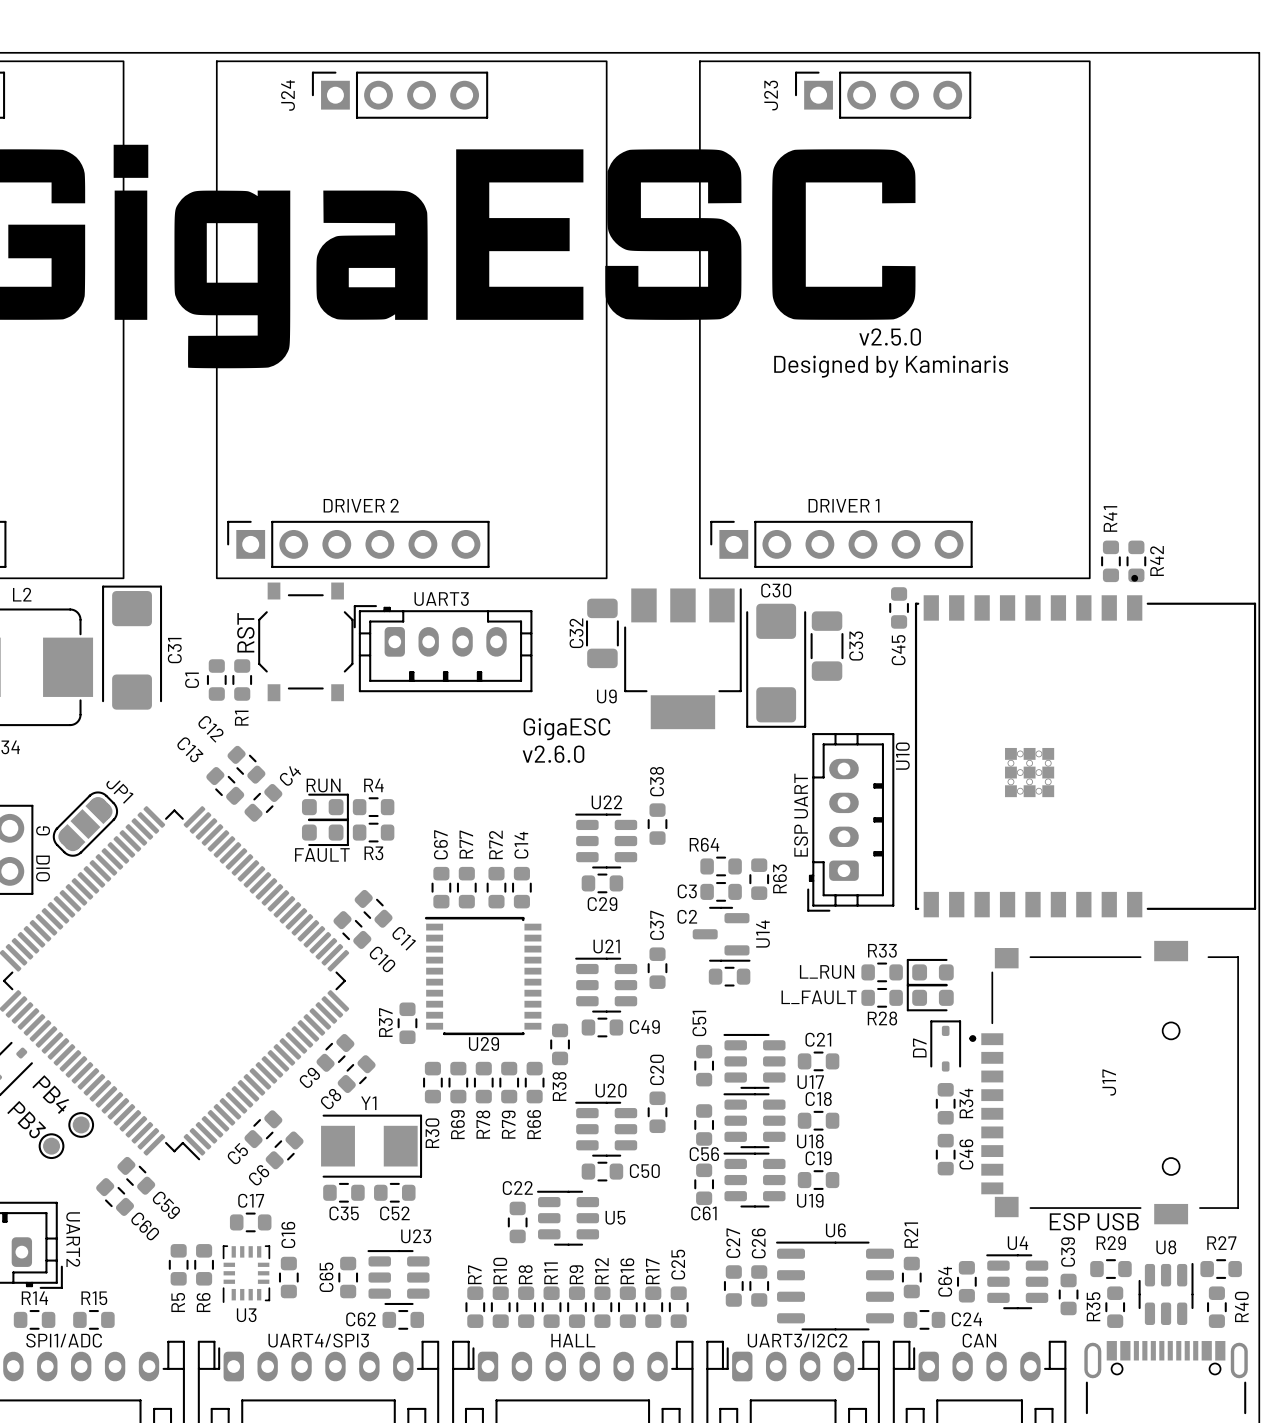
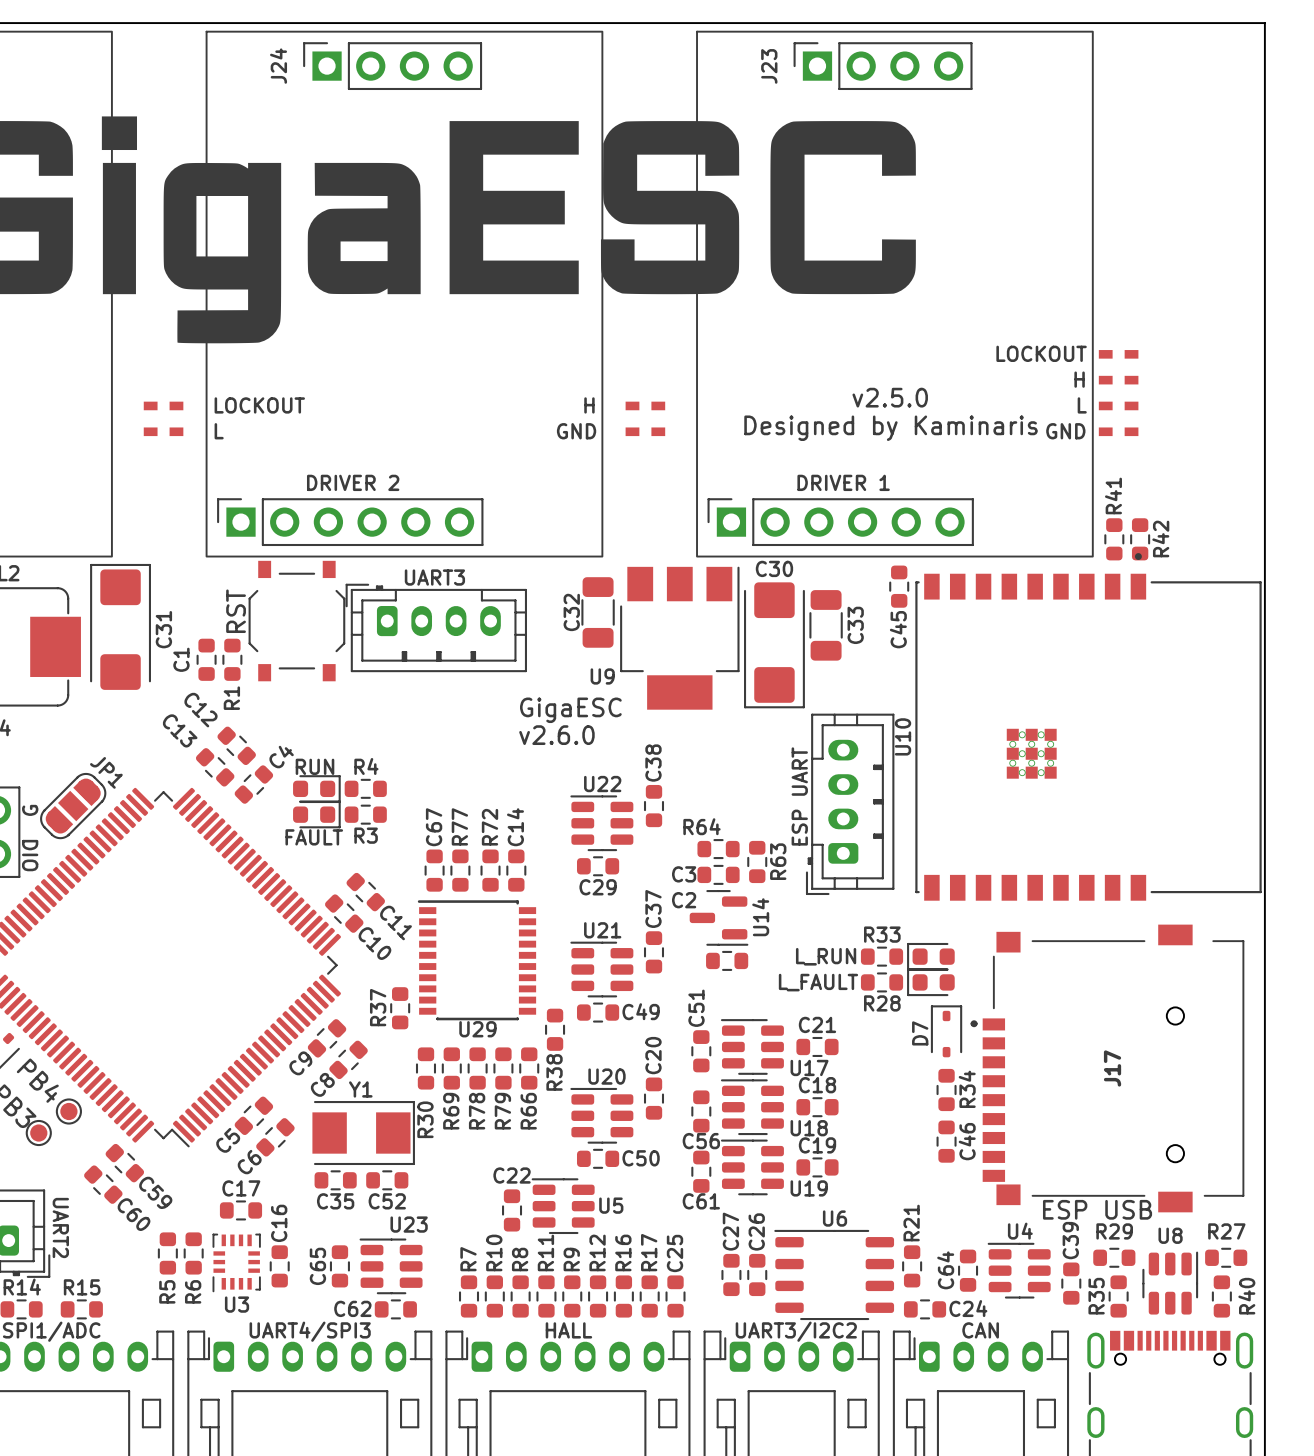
text position: v2.5.0 (890, 337) -> v2.5.0 (890, 397)
text position: Designed by Kaminaris (891, 366) -> Designed by Kaminaris (891, 428)
part: none -> (1118, 354)
part: none -> (1118, 380)
part: none -> (163, 405)
part: none -> (645, 405)
part: none -> (1118, 405)
part: none -> (163, 431)
part: none -> (645, 431)
part: none -> (1118, 431)

